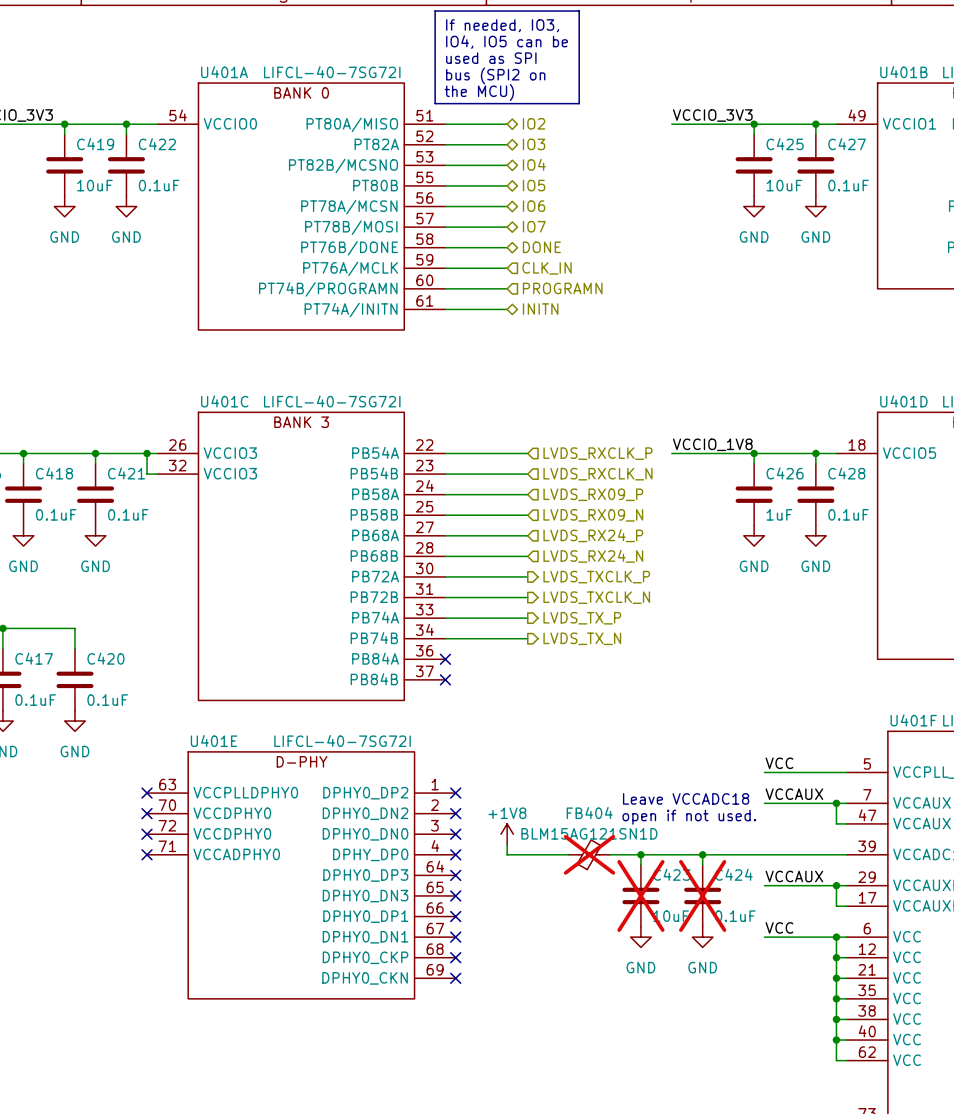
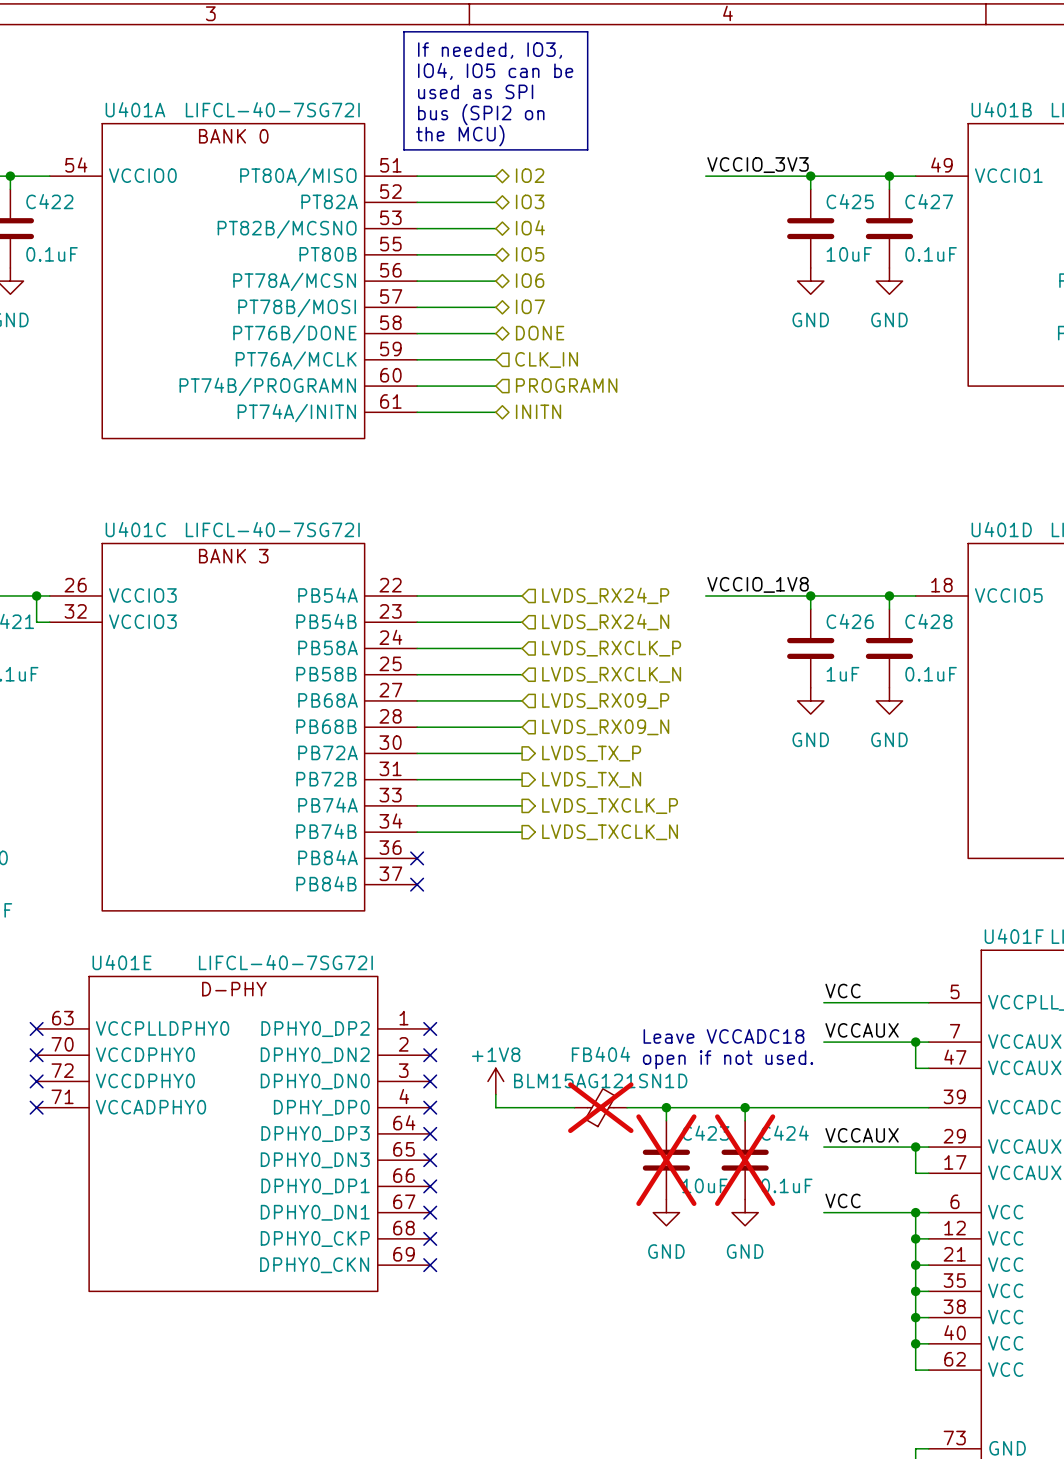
hierarchical label: LVDS_RXCLK_P (597, 453) -> LVDS_RX24_P (605, 595)
hierarchical label: LVDS_RXCLK_N (597, 474) -> LVDS_RX24_N (605, 622)
hierarchical label: LVDS_RX09_P (593, 494) -> LVDS_RXCLK_P (611, 648)
hierarchical label: LVDS_RX09_N (593, 515) -> LVDS_RXCLK_N (611, 674)
hierarchical label: LVDS_RX24_P (593, 535) -> LVDS_RX09_P (605, 701)
hierarchical label: LVDS_RX24_N (593, 556) -> LVDS_RX09_N (605, 727)
hierarchical label: LVDS_TXCLK_P (596, 577) -> LVDS_TX_P (591, 753)
hierarchical label: LVDS_TXCLK_N (596, 597) -> LVDS_TX_N (591, 779)
hierarchical label: LVDS_TX_P (582, 618) -> LVDS_TXCLK_P (610, 806)
hierarchical label: LVDS_TX_N (582, 638) -> LVDS_TXCLK_N (610, 832)

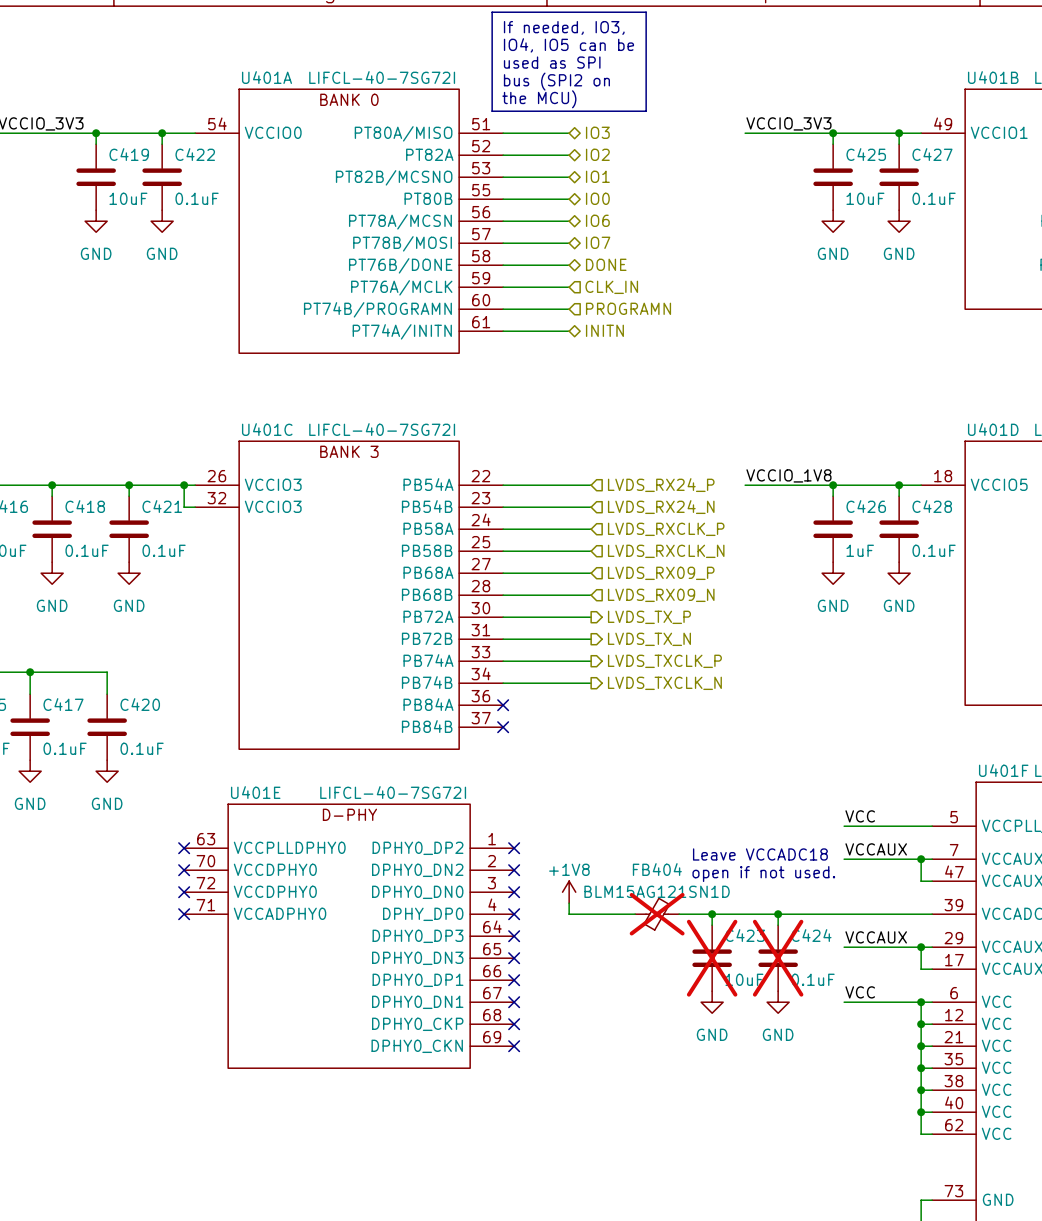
hierarchical label: IO2 (530, 175) -> IO3 (597, 132)
hierarchical label: IO3 (530, 201) -> IO2 (597, 154)
hierarchical label: IO4 (530, 227) -> IO1 (597, 176)
hierarchical label: IO5 (530, 254) -> IO0 (597, 198)

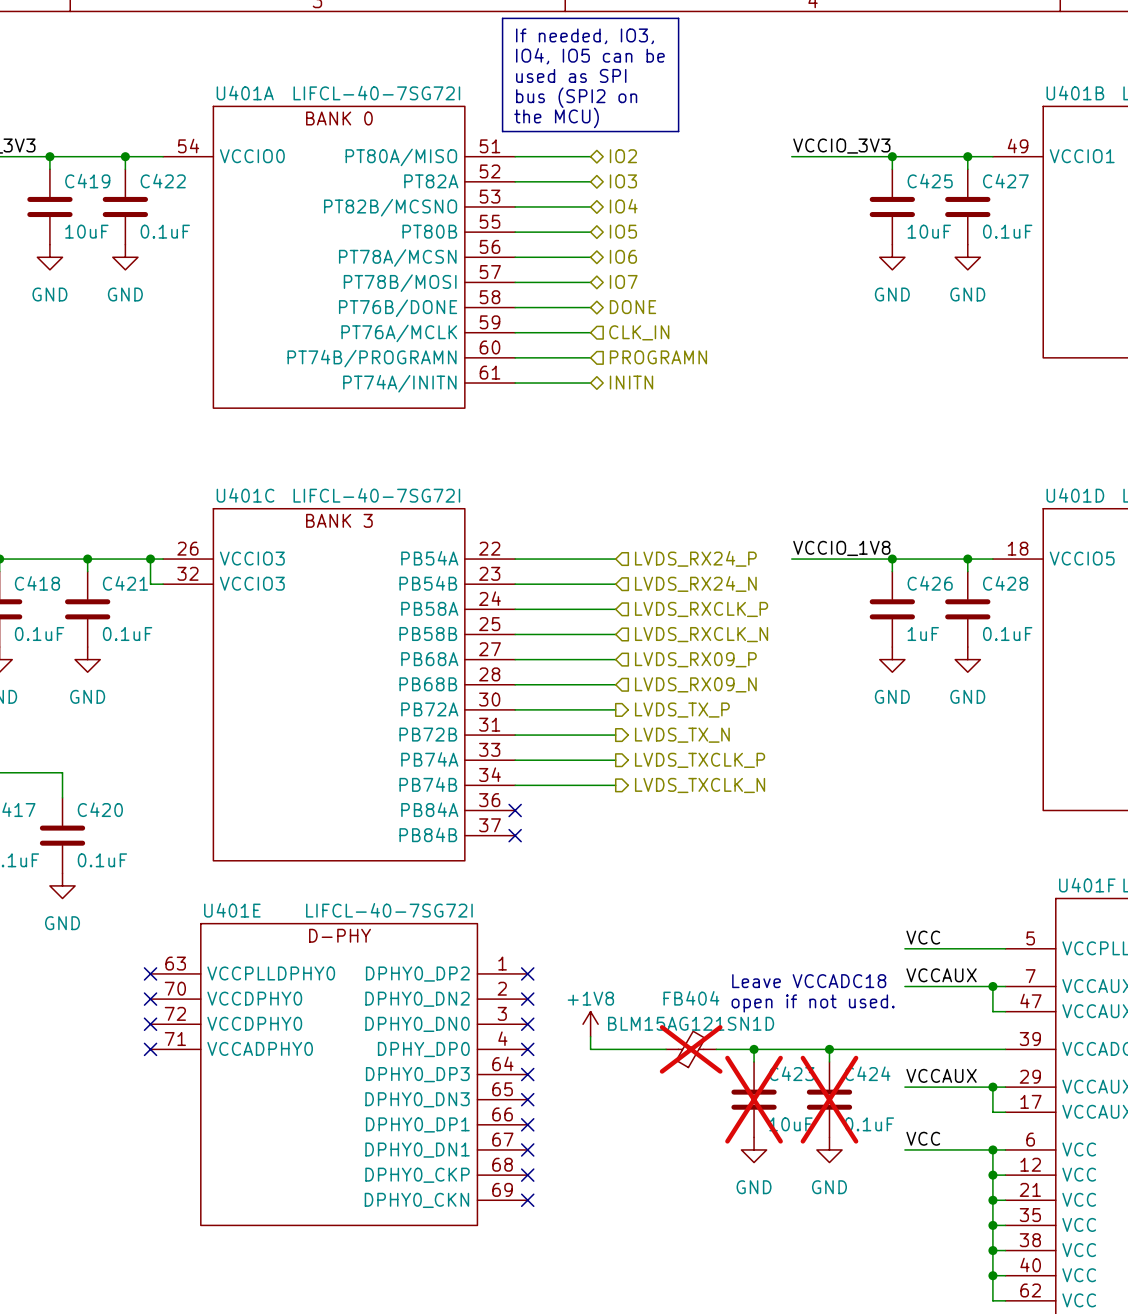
hierarchical label: IO3 (597, 132) -> IO2 (623, 156)
hierarchical label: IO2 (597, 154) -> IO3 (623, 181)
hierarchical label: IO1 (597, 176) -> IO4 (623, 206)
hierarchical label: IO0 (597, 198) -> IO5 (623, 231)

